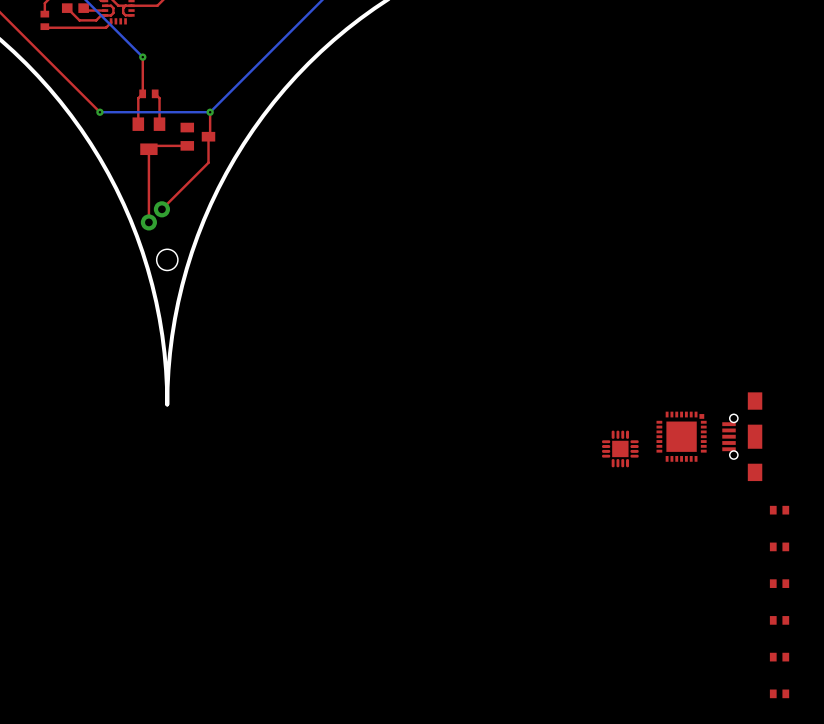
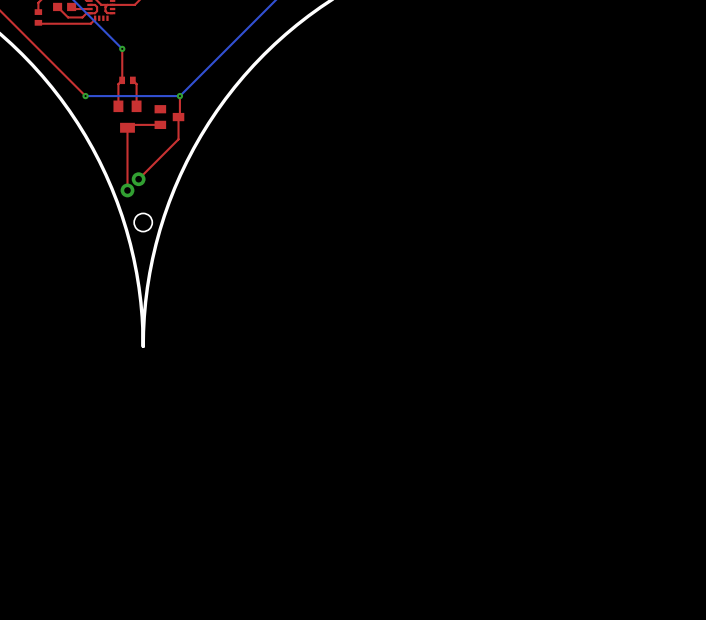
part: (681, 436) -> none
part: (742, 436) -> none
part: (620, 448) -> none
part: (779, 510) -> none
part: (779, 546) -> none
part: (779, 583) -> none
part: (779, 620) -> none
part: (779, 657) -> none
part: (779, 693) -> none

